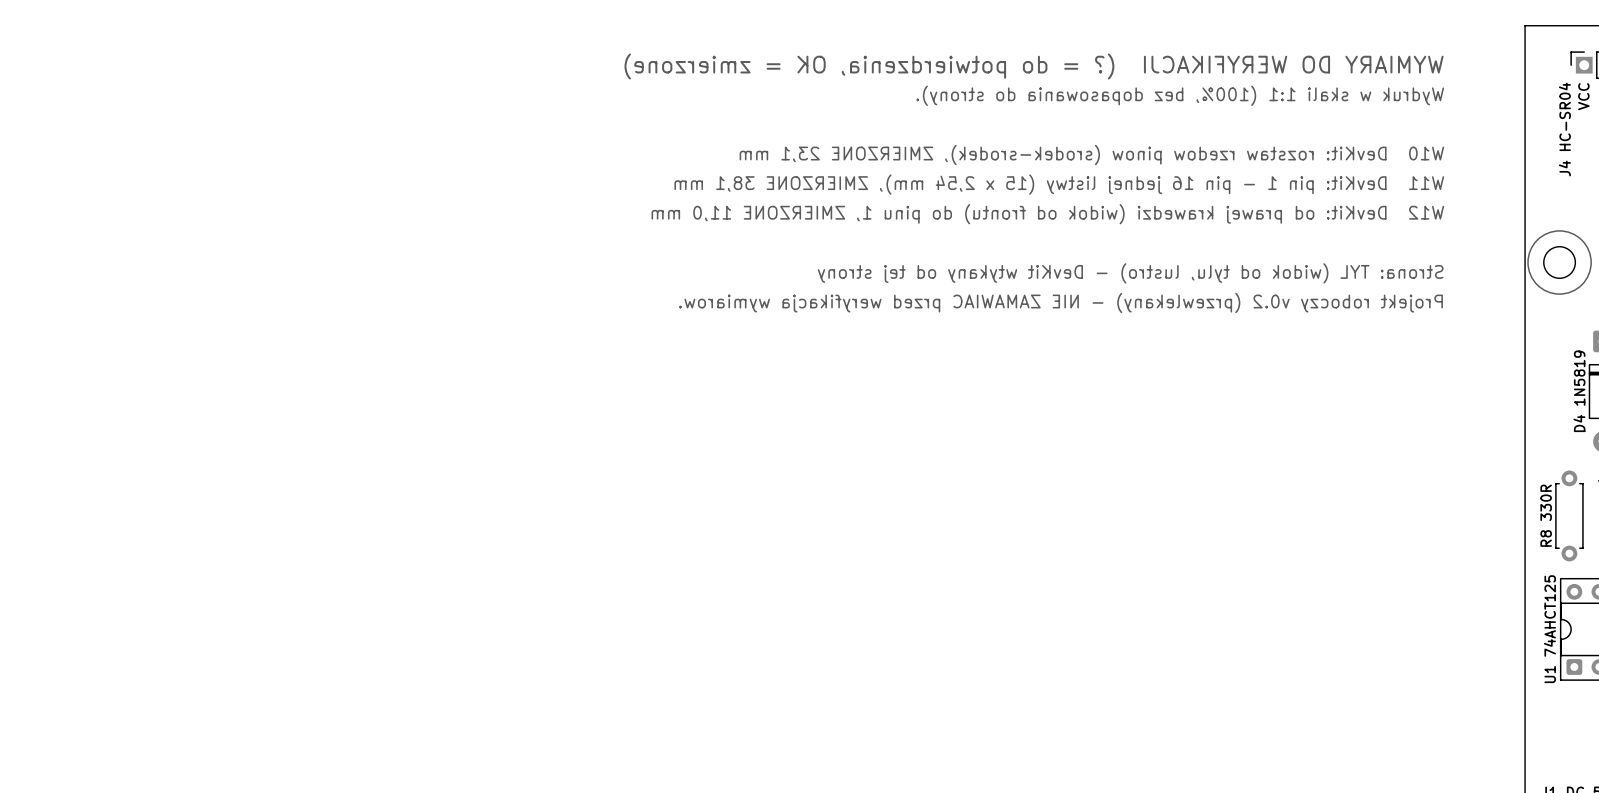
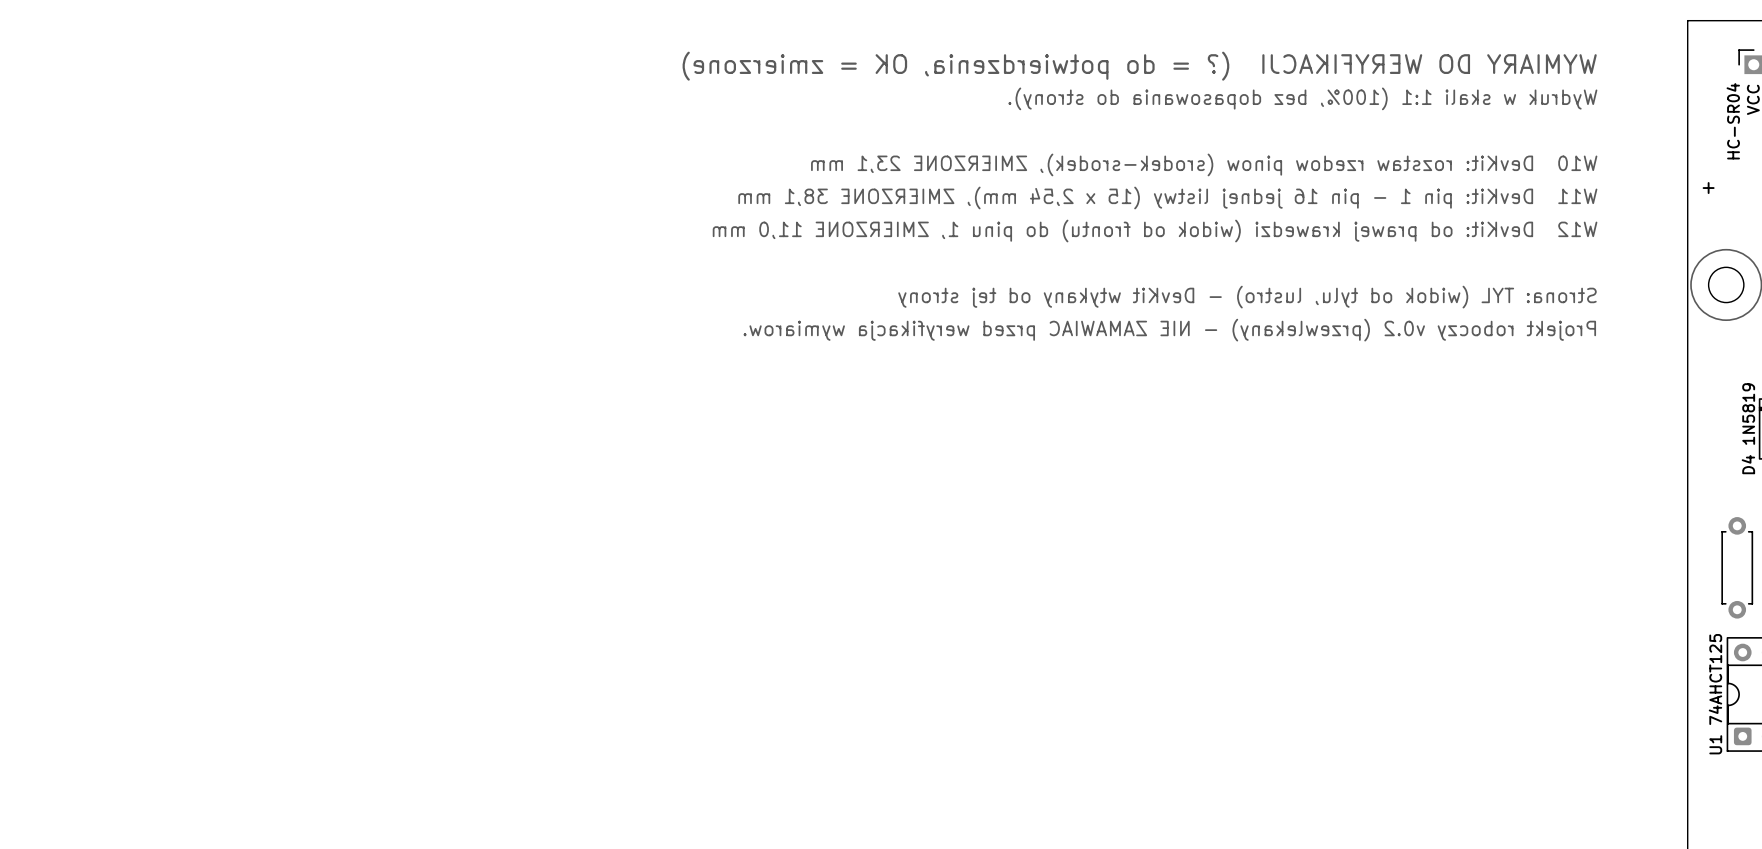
text: J4 HC-SR04 (1564, 129) -> HC-SR04 (1733, 121)
text: none -> + (1708, 188)
text: R8 330R (1546, 515) -> none

